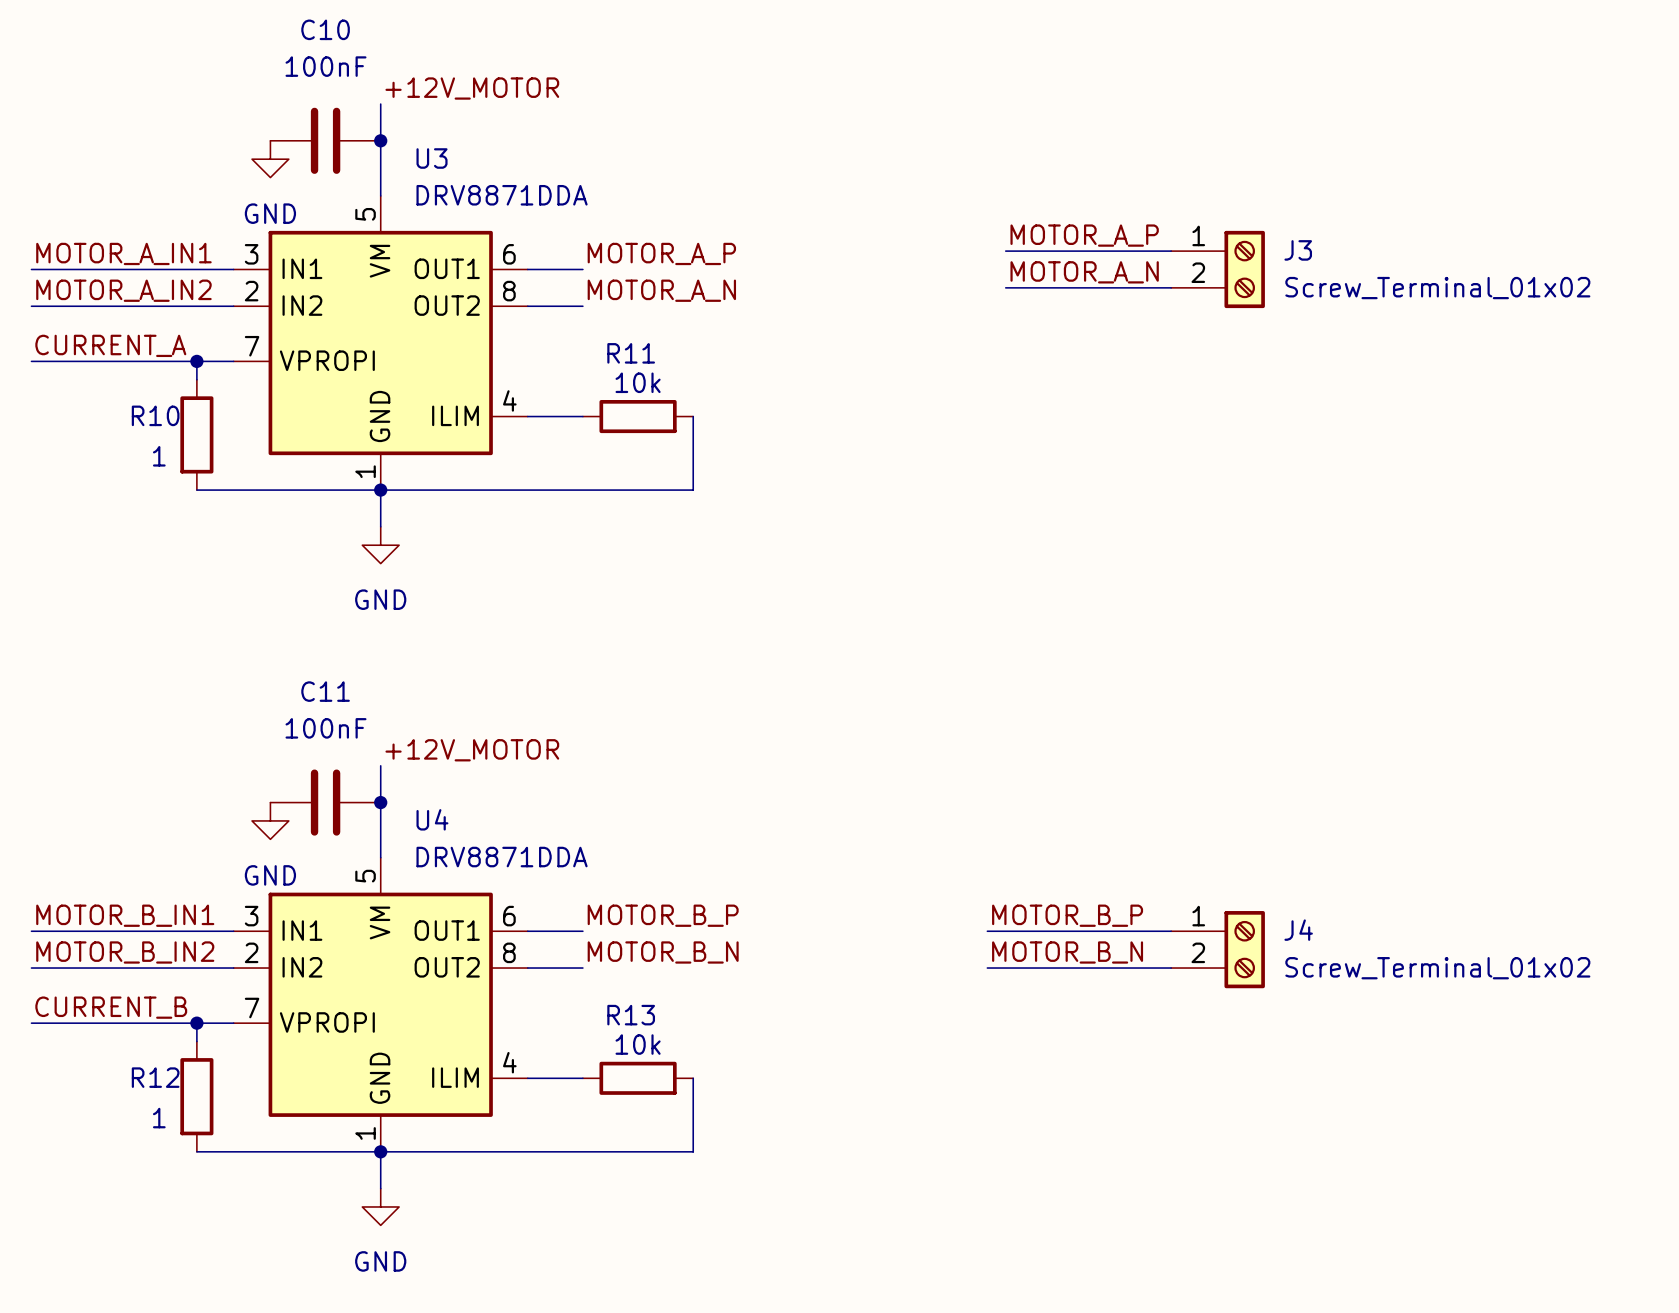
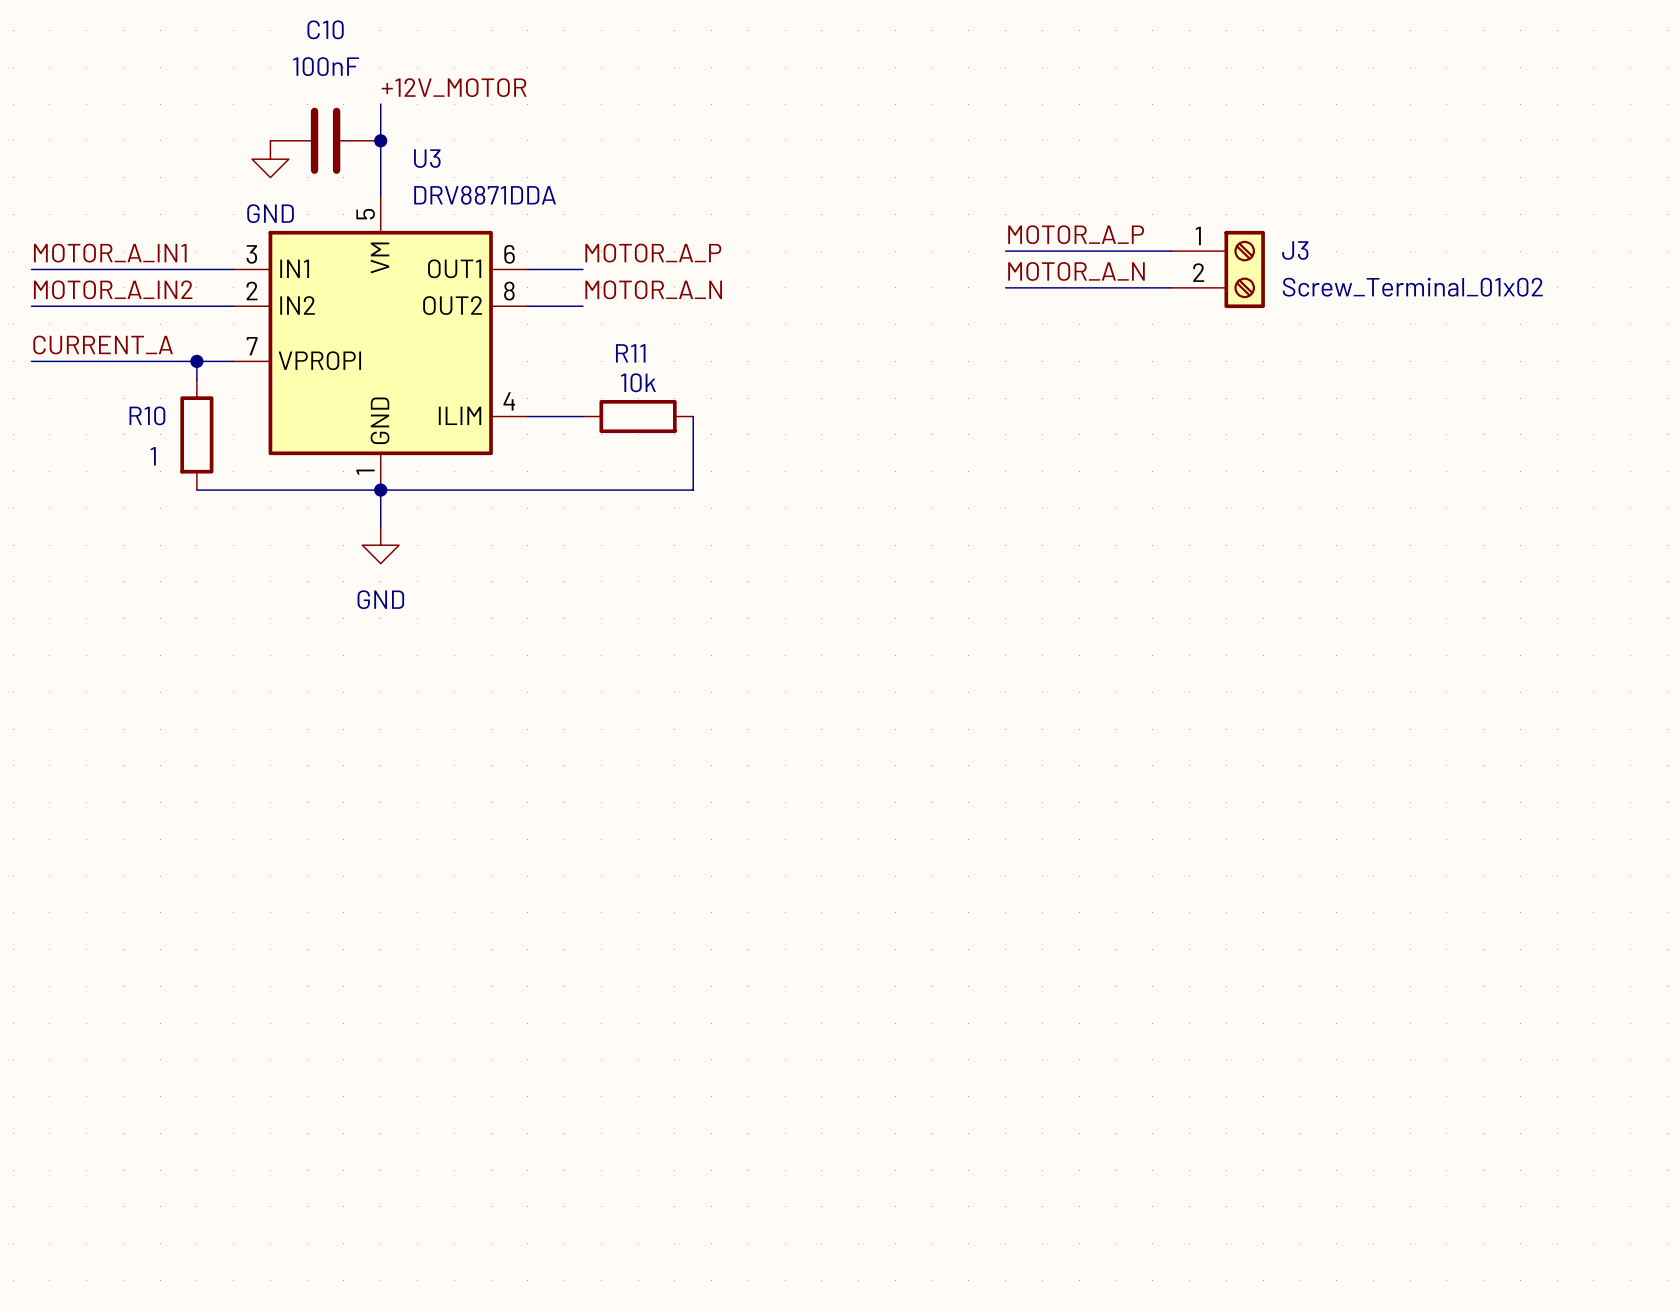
label: +12V_MOTOR (472, 750) -> none
wire: (380, 765) (380, 857) -> none
C11: 100nF (325, 802) -> none
junction: (380, 802) -> none
power symbol: GND (270, 820) -> none
label: MOTOR_B_IN1 (125, 915) -> none
label: MOTOR_B_P (663, 915) -> none
label: MOTOR_B_P (1067, 915) -> none
wire: (31, 931) (233, 931) -> none
wire: (527, 931) (582, 931) -> none
wire: (987, 931) (1171, 931) -> none
J4: Screw_Terminal_01x02 (1218, 949) -> none
label: MOTOR_B_IN2 (125, 952) -> none
label: MOTOR_B_N (663, 952) -> none
label: MOTOR_B_N (1067, 952) -> none
wire: (31, 968) (233, 968) -> none
wire: (527, 968) (582, 968) -> none
wire: (987, 968) (1171, 968) -> none
U4: DRV8871DDA (380, 1004) -> none
label: CURRENT_B (111, 1007) -> none
wire: (31, 1023) (233, 1023) -> none
wire: (196, 1023) (196, 1041) -> none
junction: (196, 1023) -> none
wire: (527, 1078) (582, 1078) -> none
R13: 10k (638, 1078) -> none
wire: (693, 1078) (693, 1151) (196, 1151) -> none
R12: 1 (196, 1096) -> none
wire: (380, 1151) (380, 1188) -> none
junction: (380, 1151) -> none
power symbol: GND (380, 1206) -> none

